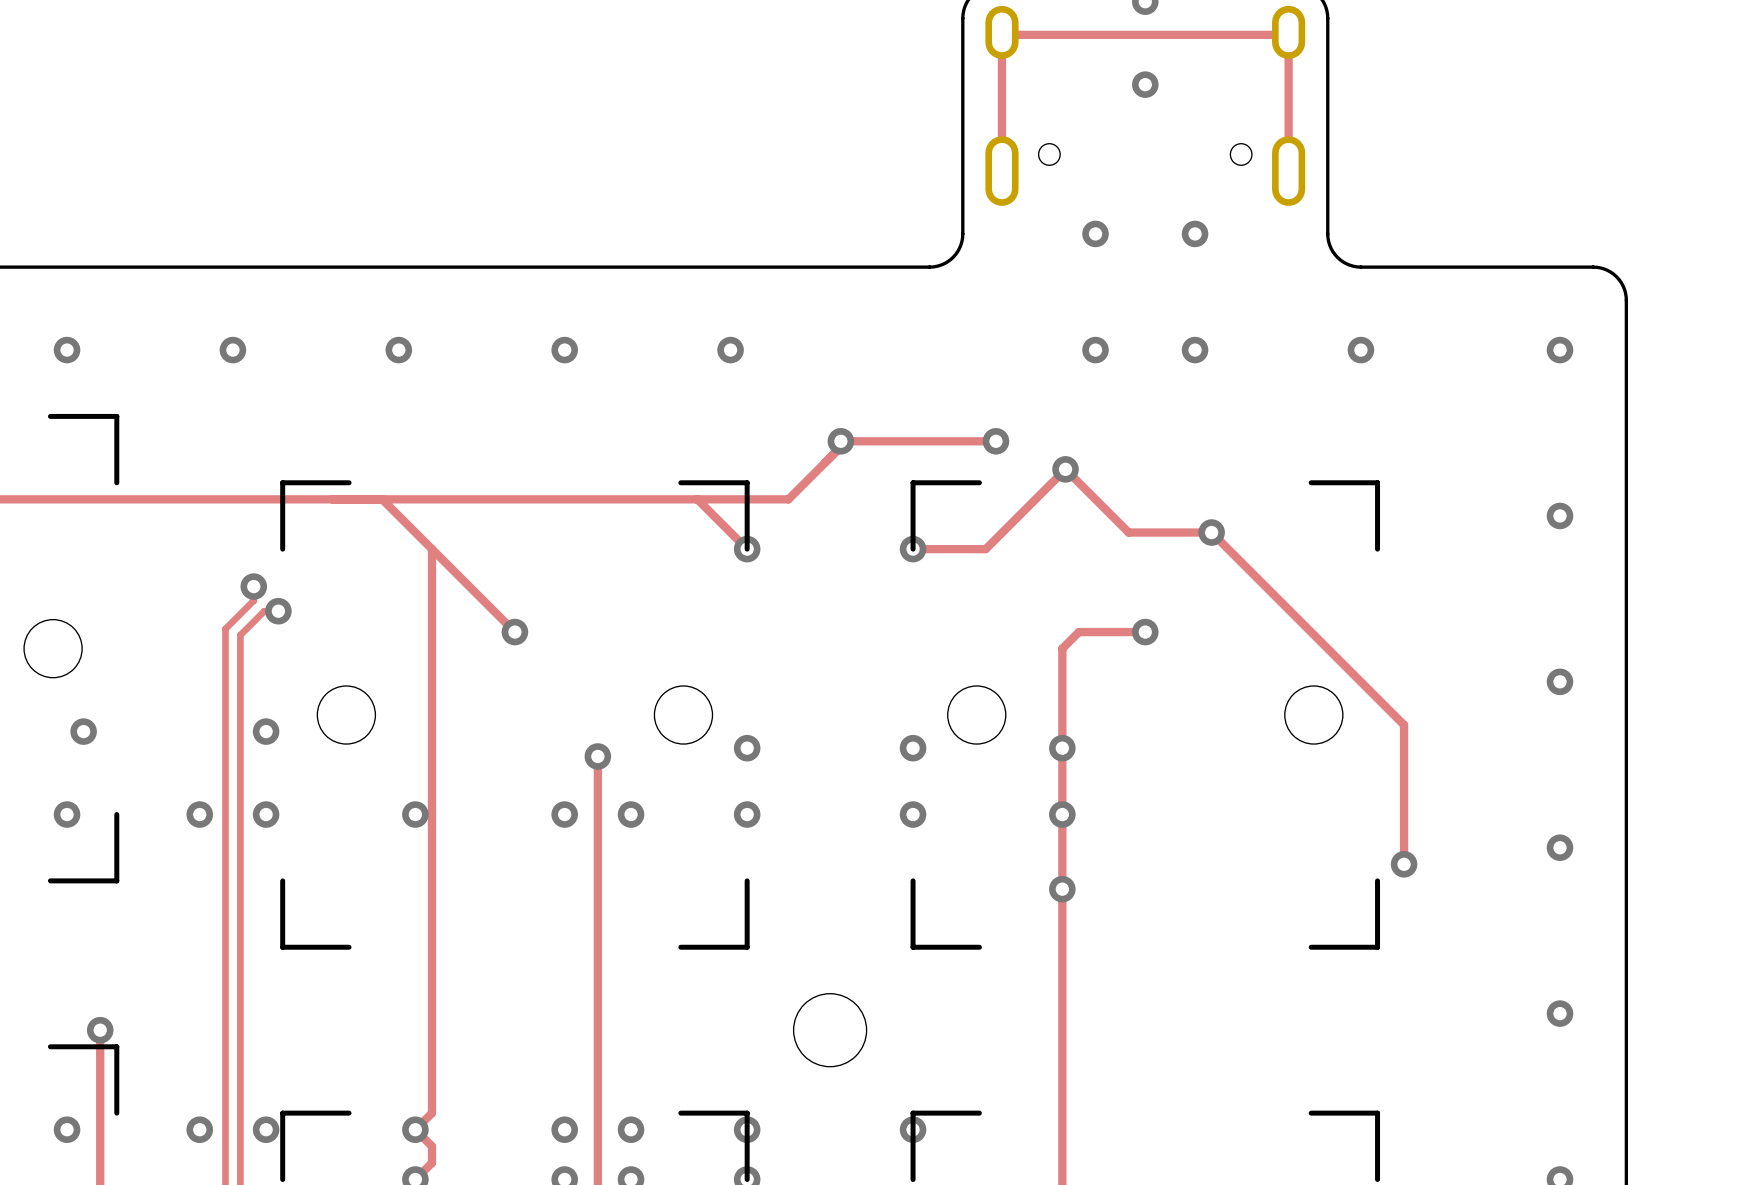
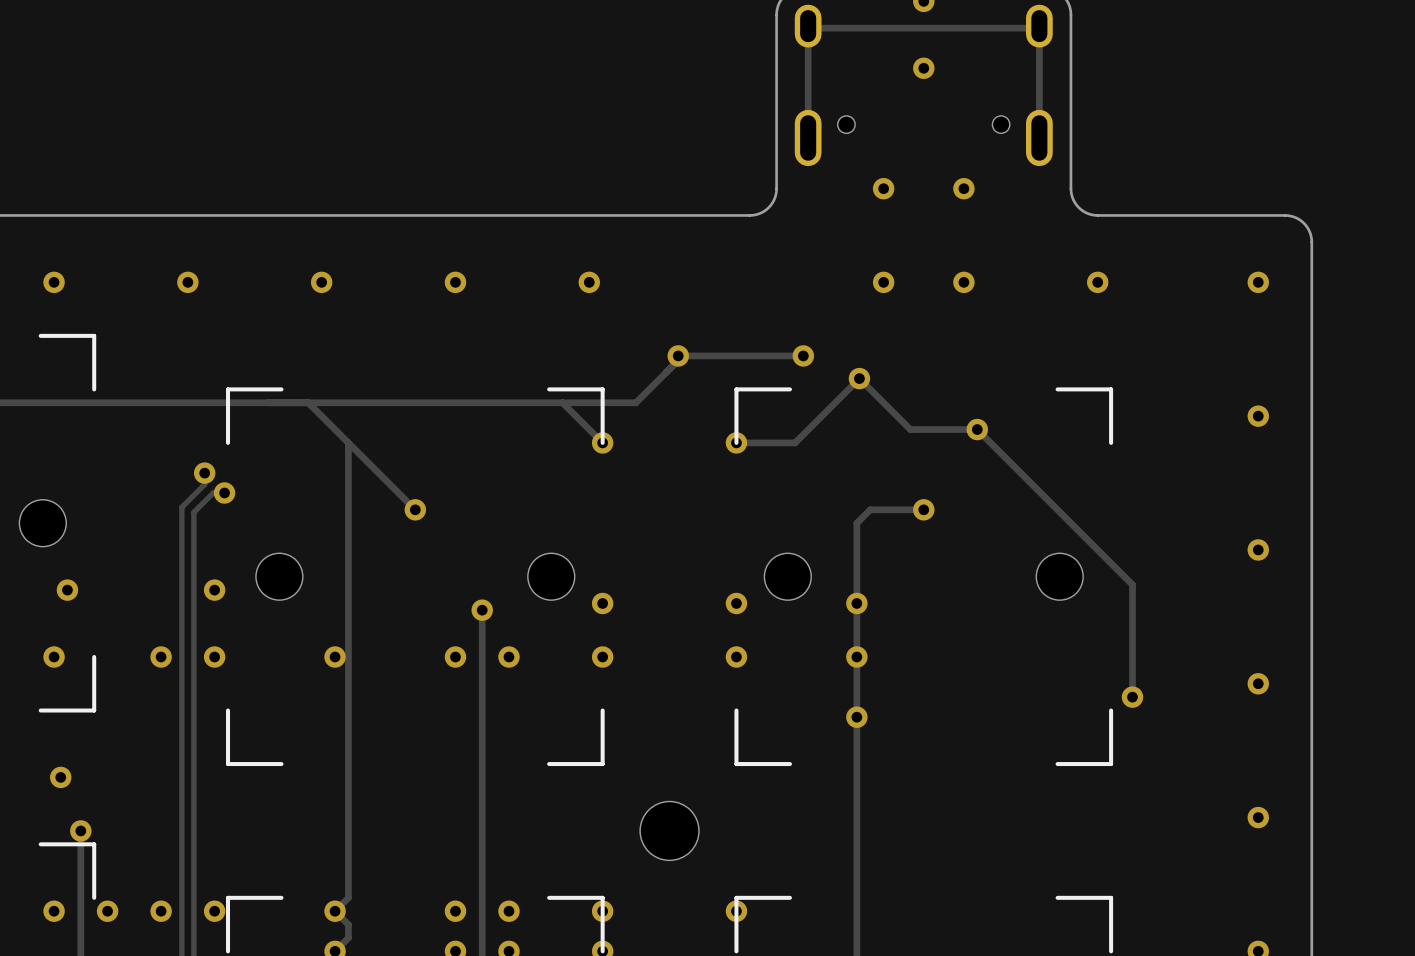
via: none -> (60, 777)
via: none -> (107, 911)

